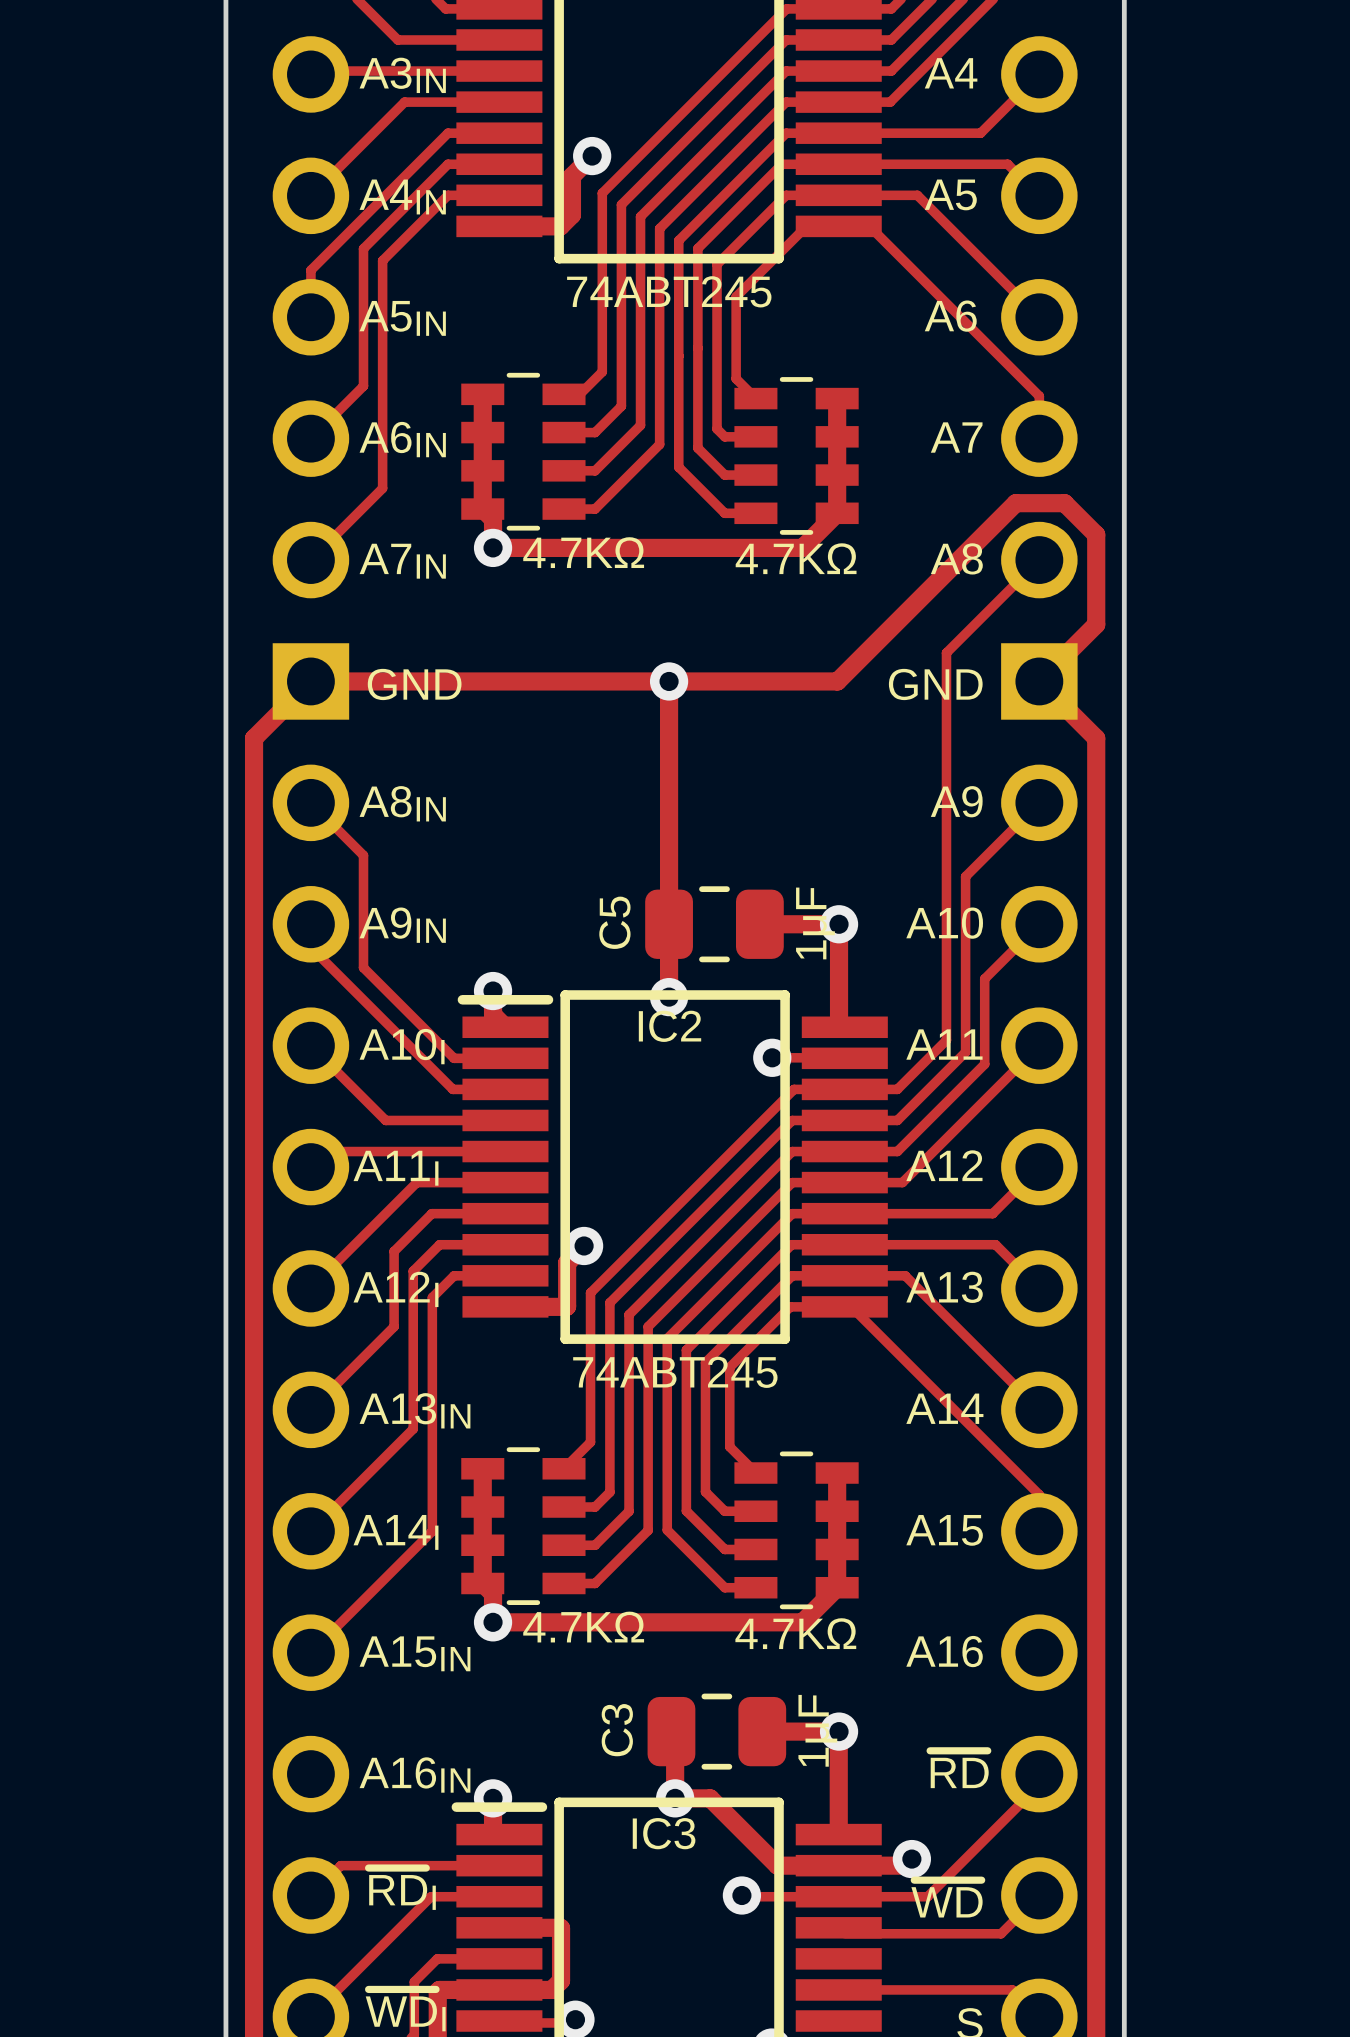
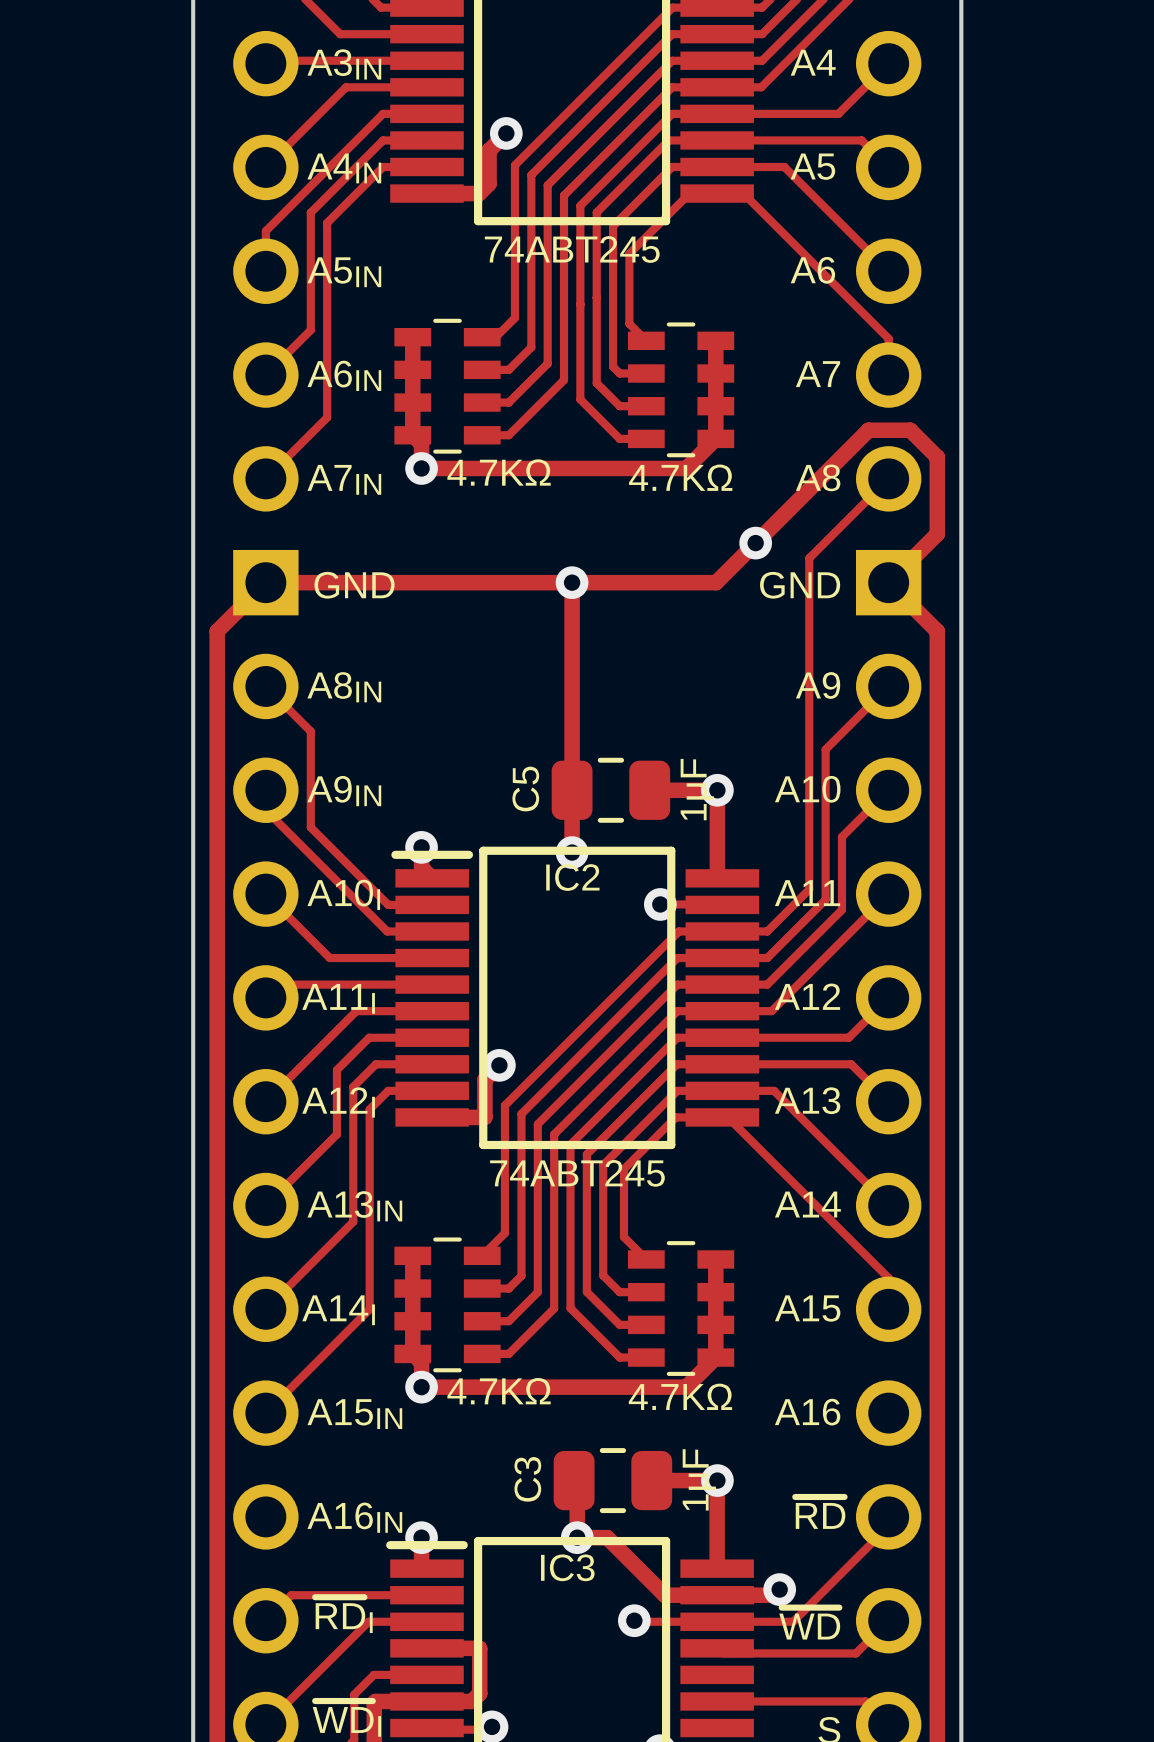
via: none -> (755, 543)

